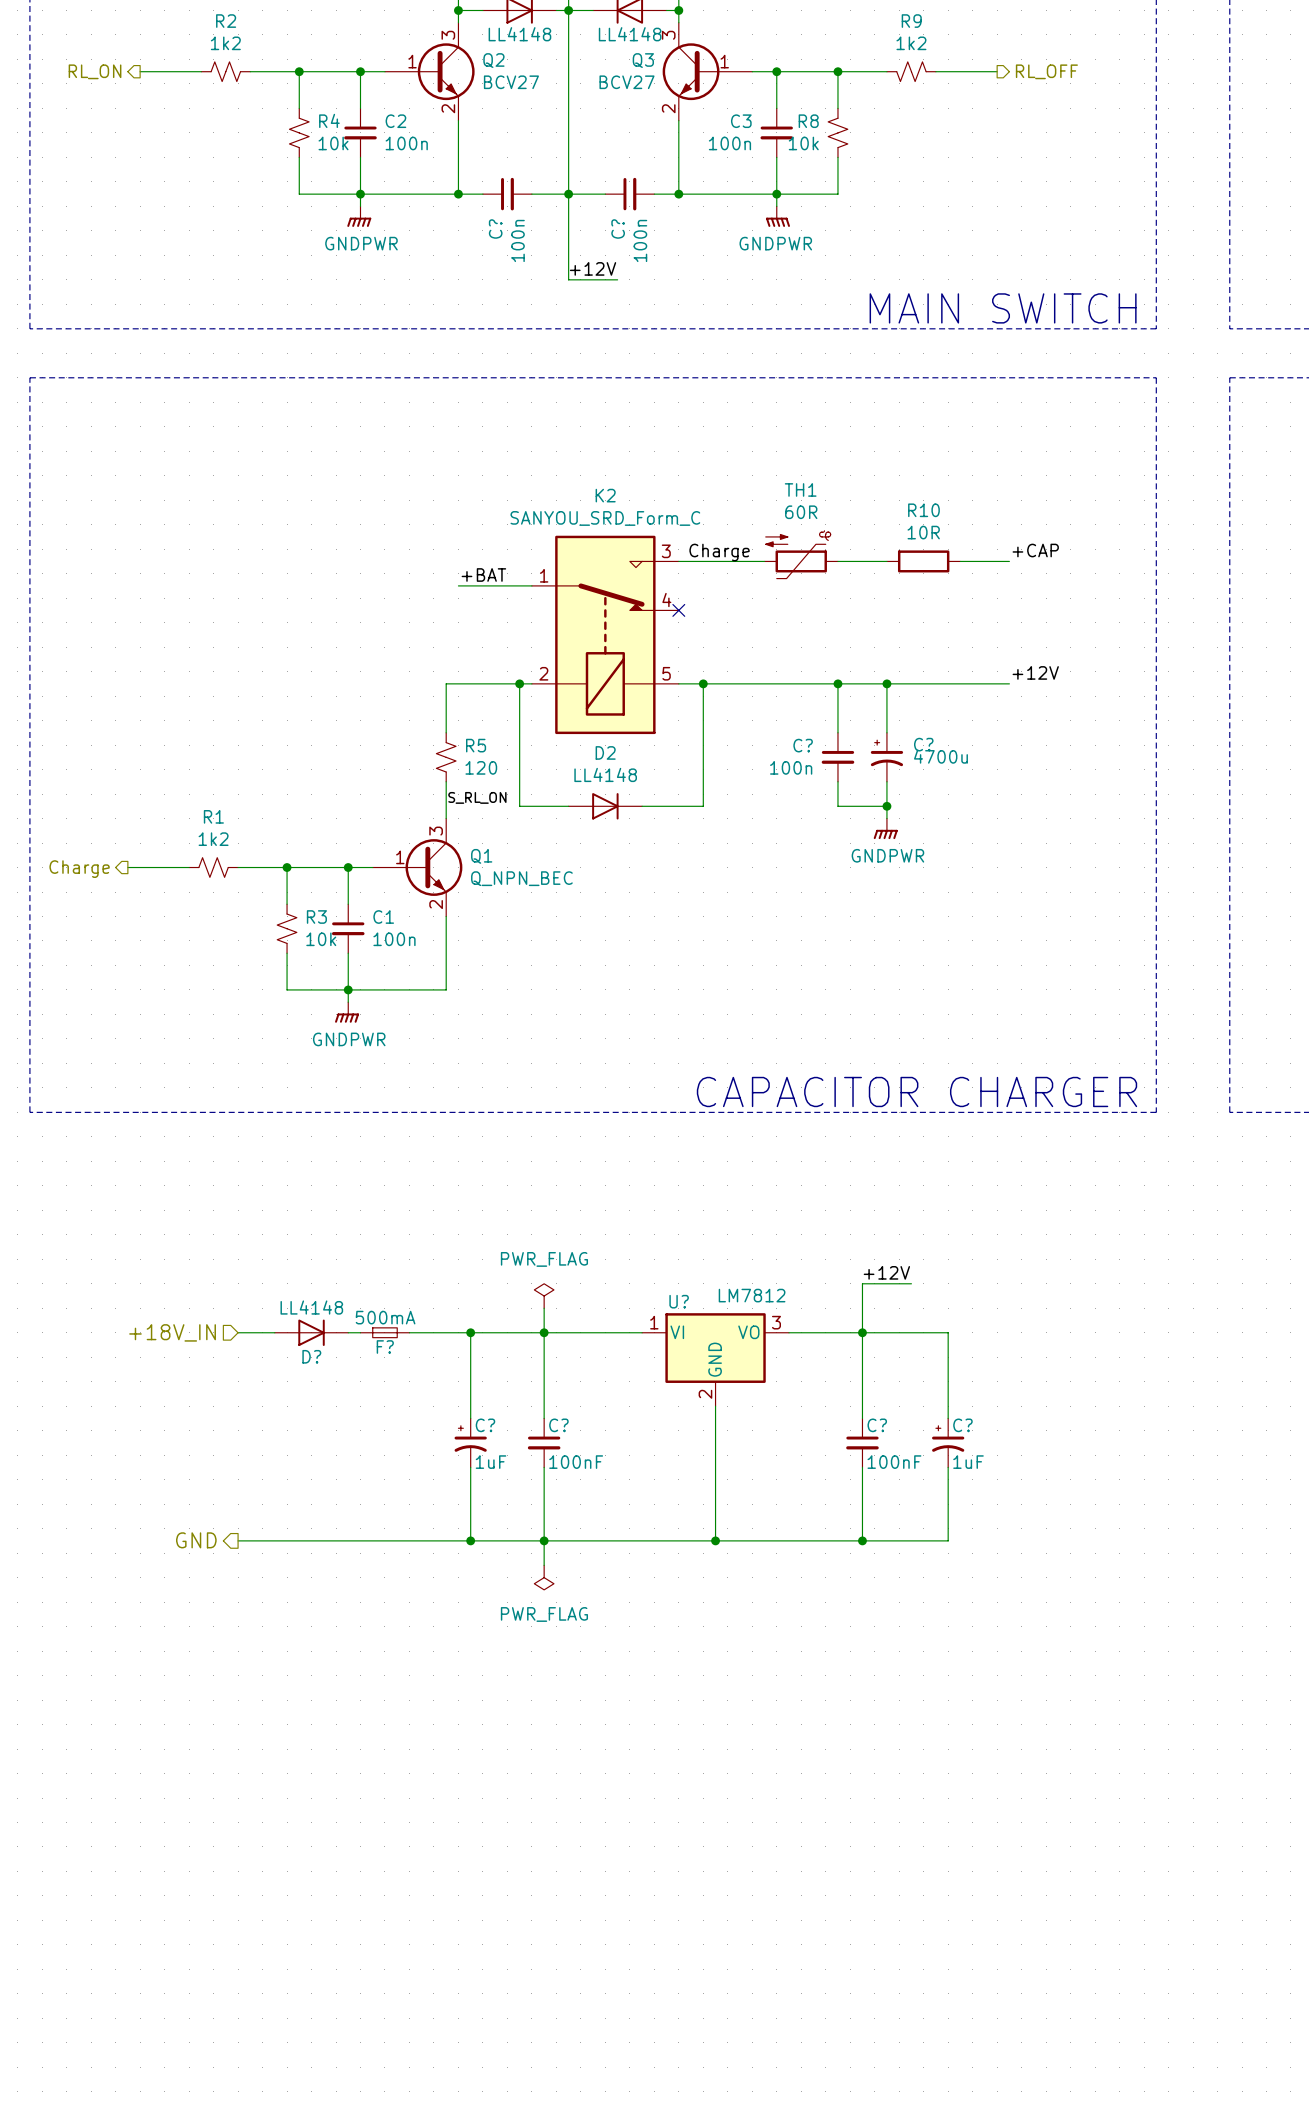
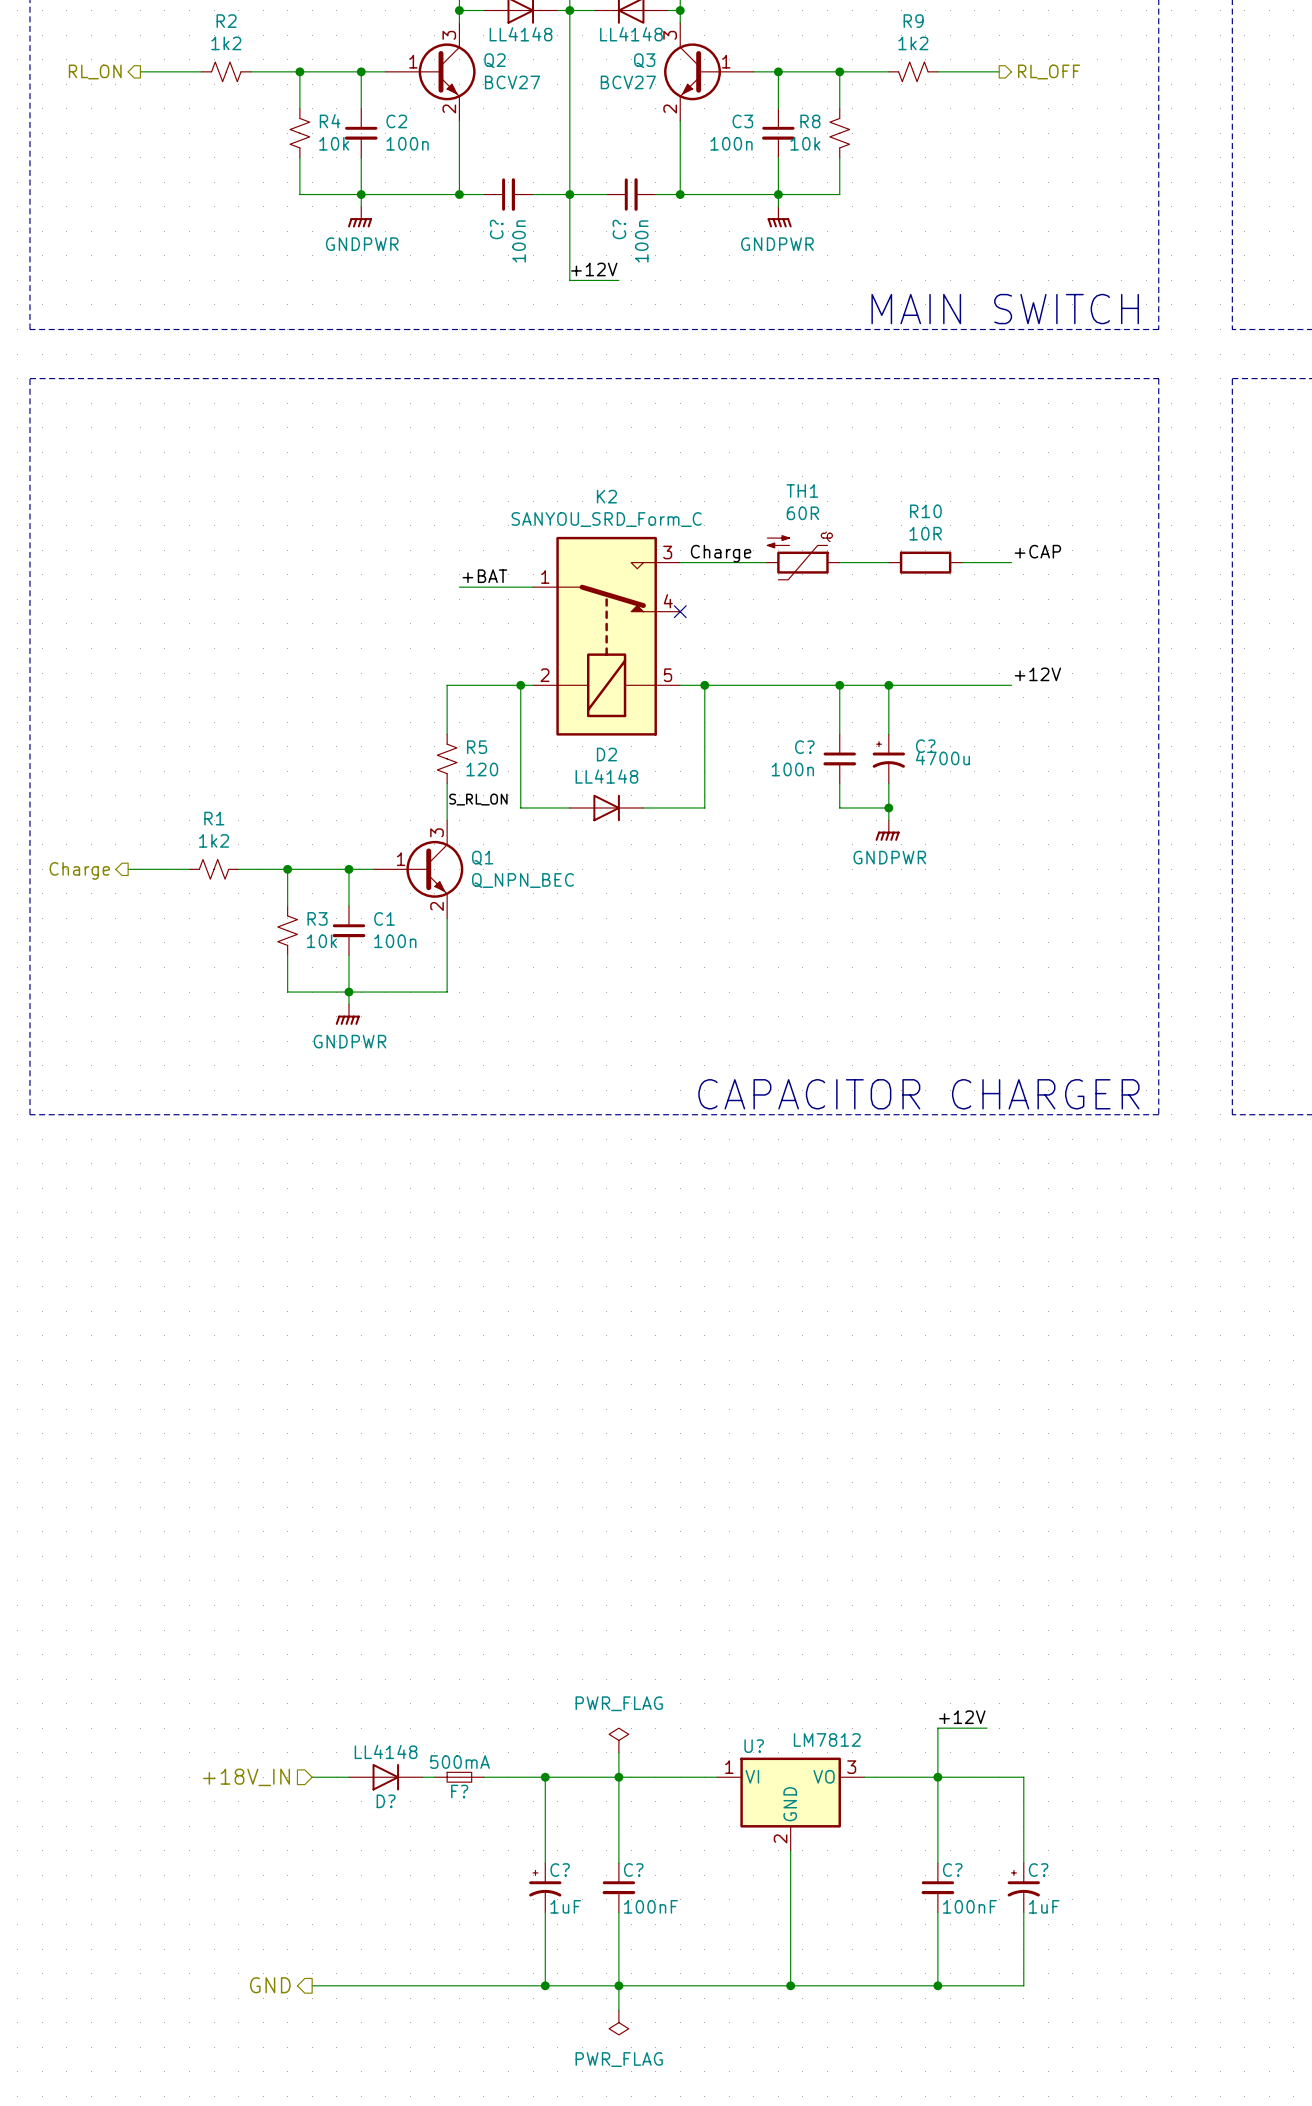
label: +12V (886, 1272) -> none
wire: (911, 1283) (862, 1283) (862, 1418) -> none
power symbol: PWR_FLAG (544, 1296) -> none
wire: (544, 1308) (544, 1418) -> none
hierarchical label: +18V_IN (172, 1332) -> none
wire: (238, 1332) (274, 1332) -> none
D?: LL4148 (311, 1332) -> none
wire: (348, 1332) (360, 1332) -> none
F?: 500mA (384, 1332) -> none
wire: (409, 1332) (642, 1332) -> none
wire: (470, 1332) (470, 1418) -> none
junction: (470, 1332) -> none
junction: (544, 1332) -> none
wire: (789, 1332) (948, 1332) (948, 1418) -> none
junction: (862, 1332) -> none
U?: LM7812 (715, 1359) -> none
wire: (715, 1406) (715, 1540) -> none
C?: 1uF (470, 1442) -> none
C?: 100nF (544, 1442) -> none
C?: 100nF (862, 1442) -> none
C?: 1uF (948, 1442) -> none
wire: (470, 1467) (470, 1540) -> none
wire: (544, 1467) (544, 1565) -> none
wire: (862, 1467) (862, 1540) -> none
wire: (948, 1467) (948, 1540) (238, 1540) -> none
hierarchical label: GND (196, 1540) -> none
junction: (470, 1540) -> none
junction: (544, 1540) -> none
junction: (715, 1540) -> none
junction: (862, 1540) -> none
power symbol rotation: 0° (544, 1577) -> 180° (618, 1740)
power symbol position: PWR_FLAG (544, 1577) -> PWR_FLAG (618, 1740)
label: none -> +12V (962, 1717)
wire: none -> (986, 1728) (937, 1728) (937, 1863)
wire: none -> (618, 1752) (618, 1863)
hierarchical label: none -> +18V_IN (246, 1777)
wire: none -> (312, 1777) (348, 1777)
D?: none -> LL4148 (385, 1777)
wire: none -> (422, 1777) (434, 1777)
F?: none -> 500mA (459, 1777)
wire: none -> (483, 1777) (717, 1777)
wire: none -> (545, 1777) (545, 1863)
junction: none -> (545, 1777)
junction: none -> (618, 1777)
wire: none -> (864, 1777) (1023, 1777) (1023, 1863)
junction: none -> (937, 1777)
U?: none -> LM7812 (790, 1804)
wire: none -> (790, 1850) (790, 1985)
C?: none -> 1uF (545, 1887)
C?: none -> 100nF (618, 1887)
C?: none -> 100nF (937, 1887)
C?: none -> 1uF (1023, 1887)
wire: none -> (545, 1912) (545, 1985)
wire: none -> (618, 1912) (618, 2010)
wire: none -> (937, 1912) (937, 1985)
wire: none -> (1023, 1912) (1023, 1985) (312, 1985)
hierarchical label: none -> GND (270, 1985)
junction: none -> (545, 1985)
junction: none -> (618, 1985)
junction: none -> (790, 1985)
junction: none -> (937, 1985)
power symbol: none -> PWR_FLAG (618, 2022)

